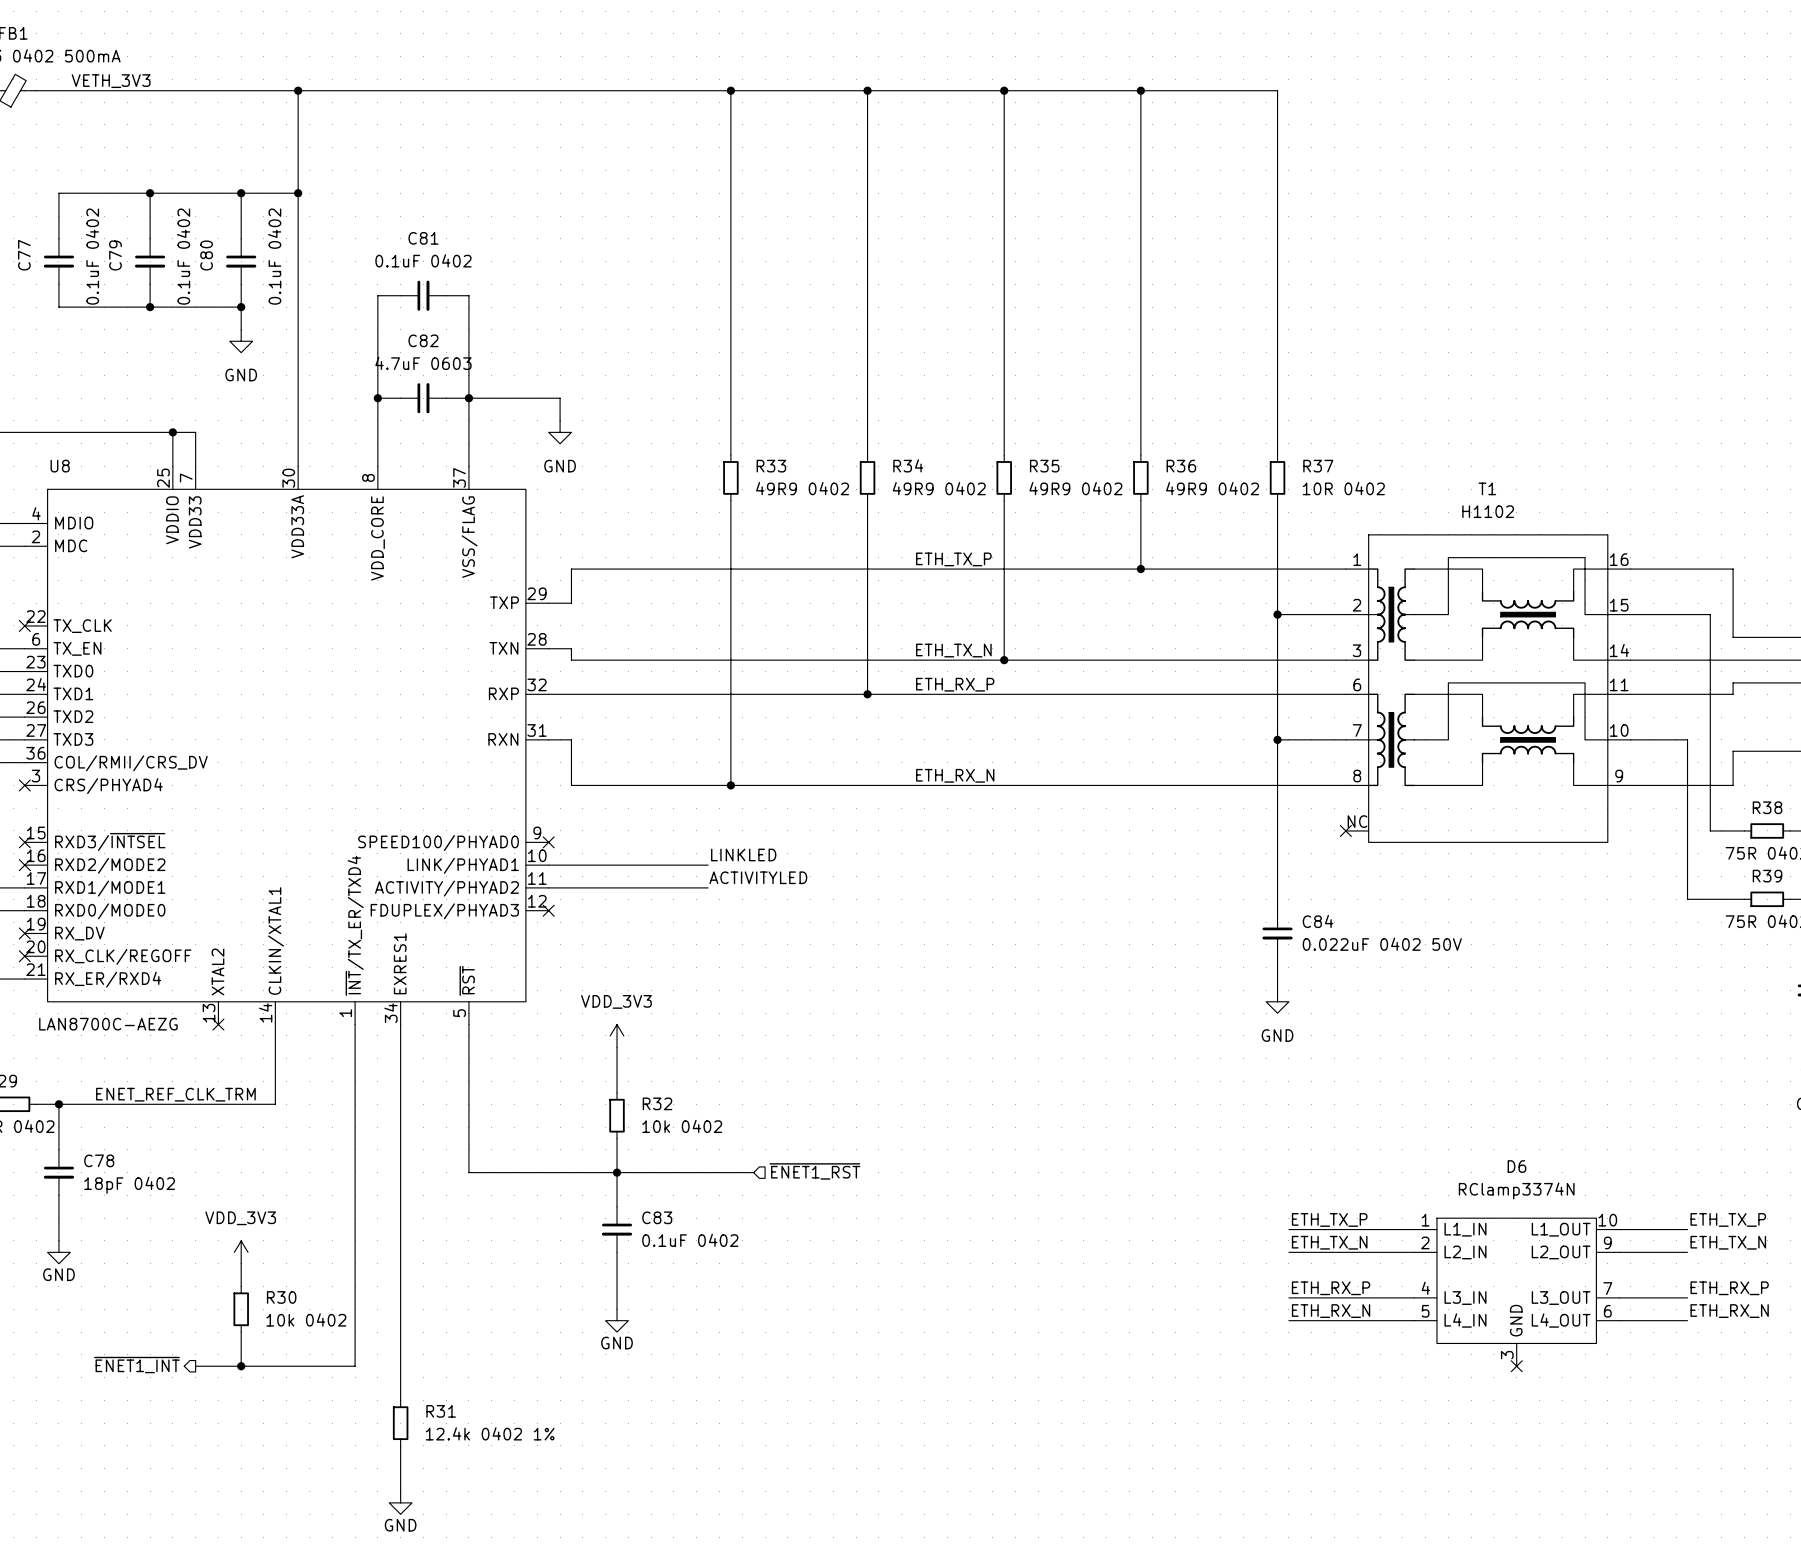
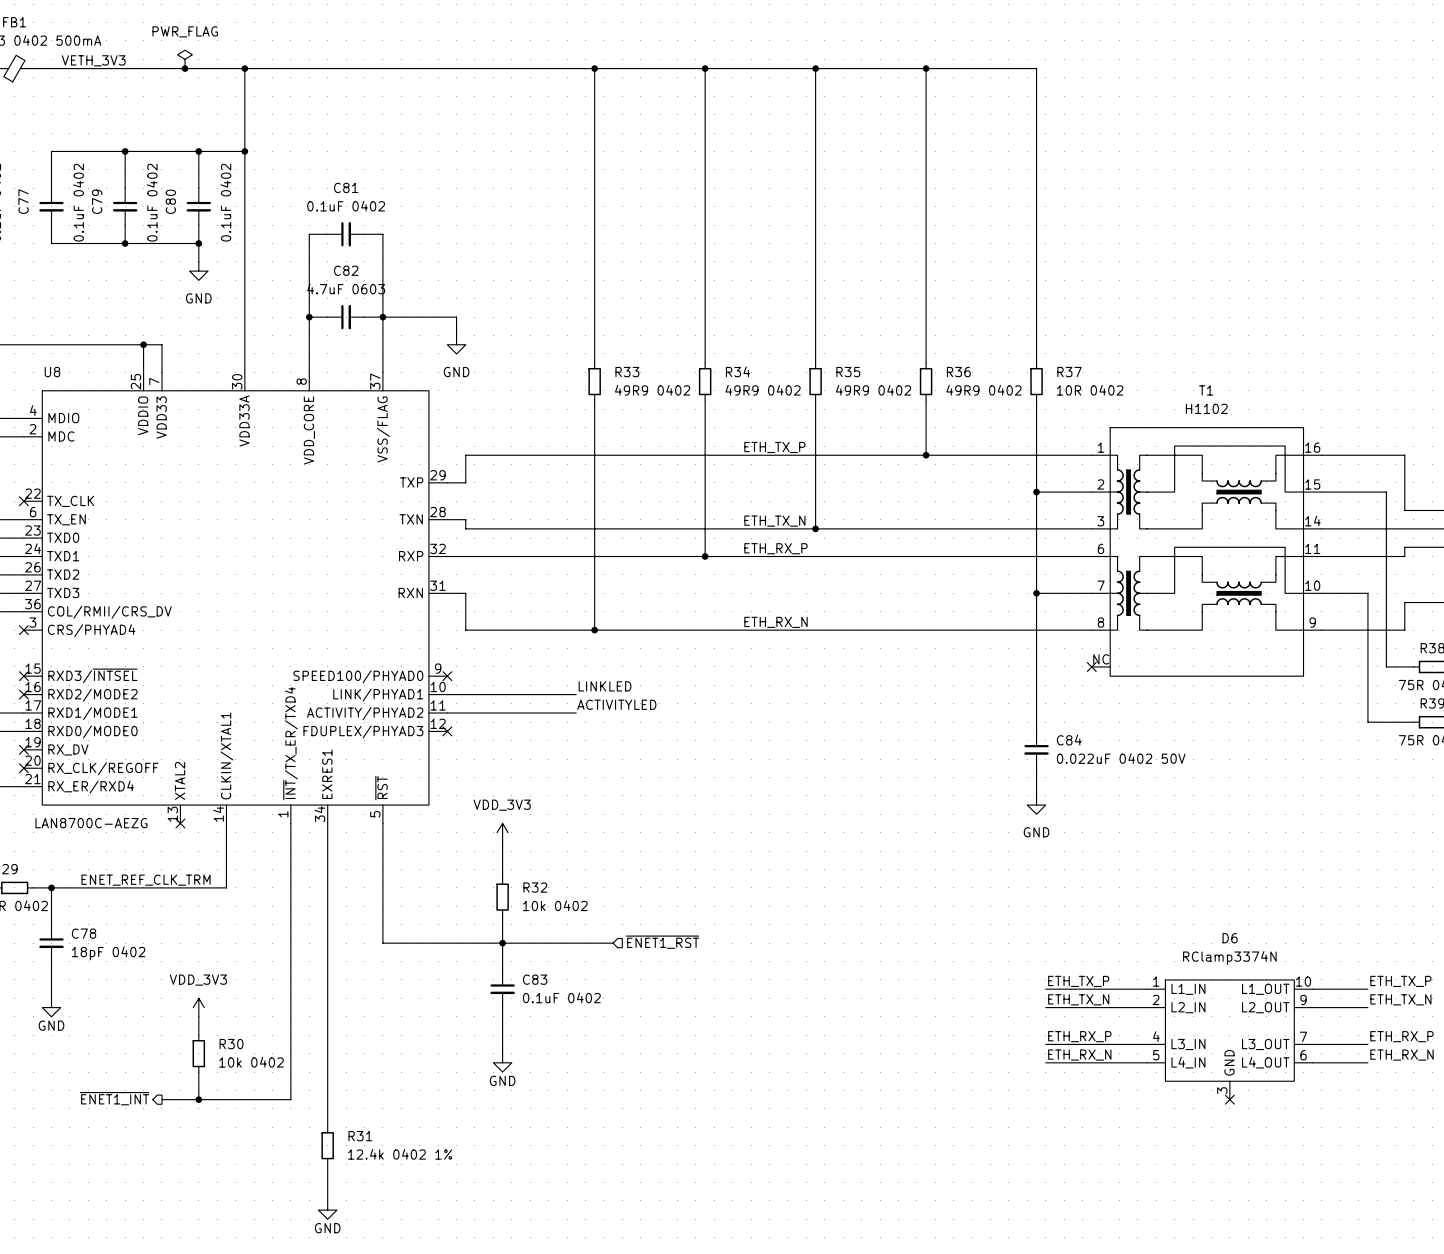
power symbol: none -> PWR_FLAG (185, 59)
junction: none -> (185, 68)

